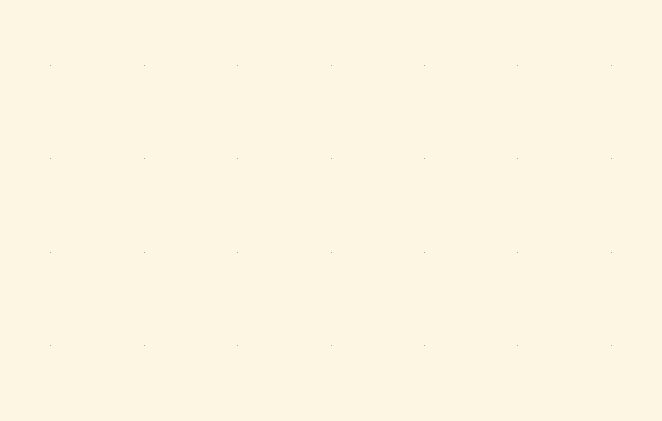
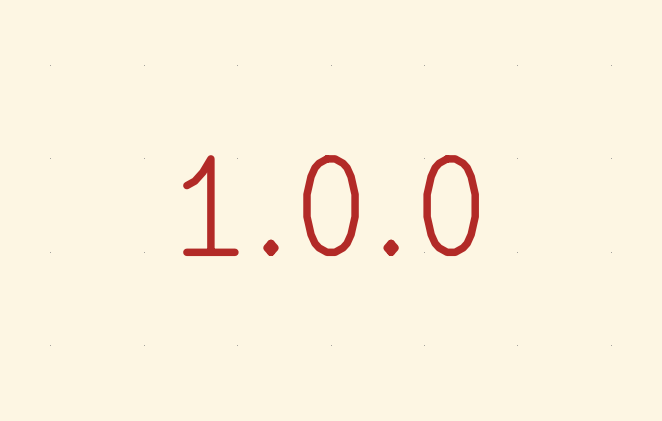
text: none -> 1.0.0 (331, 205)

